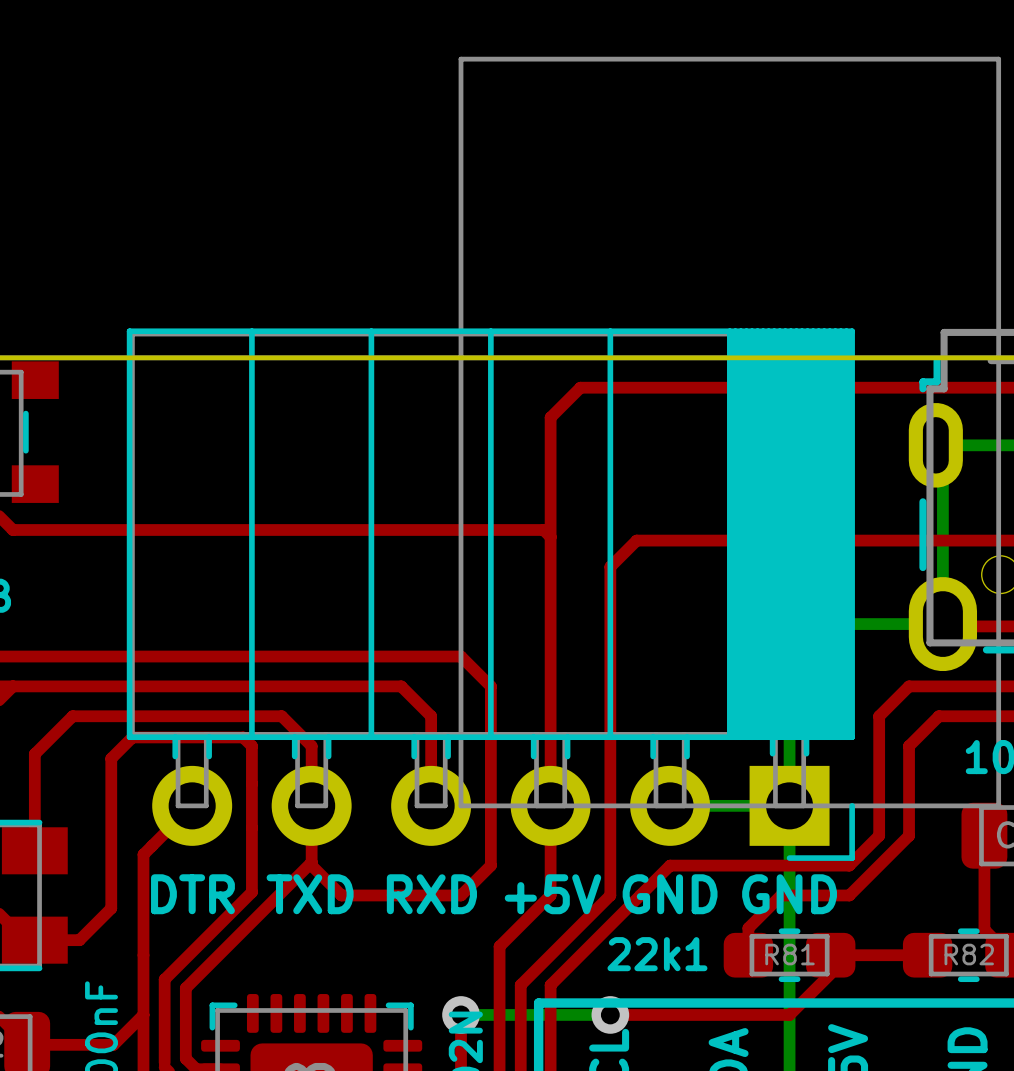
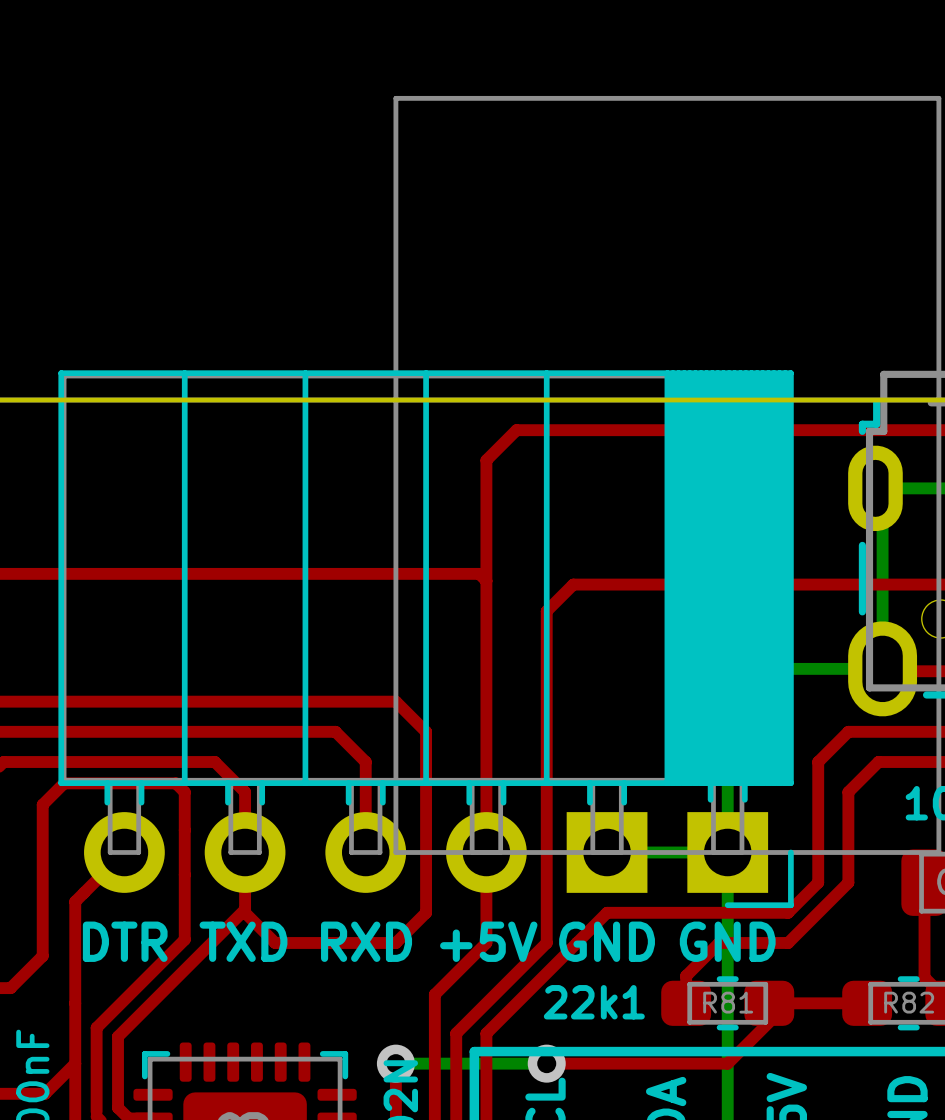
part footprint: [126, 328, 855, 861] -> [58, 370, 794, 909]

